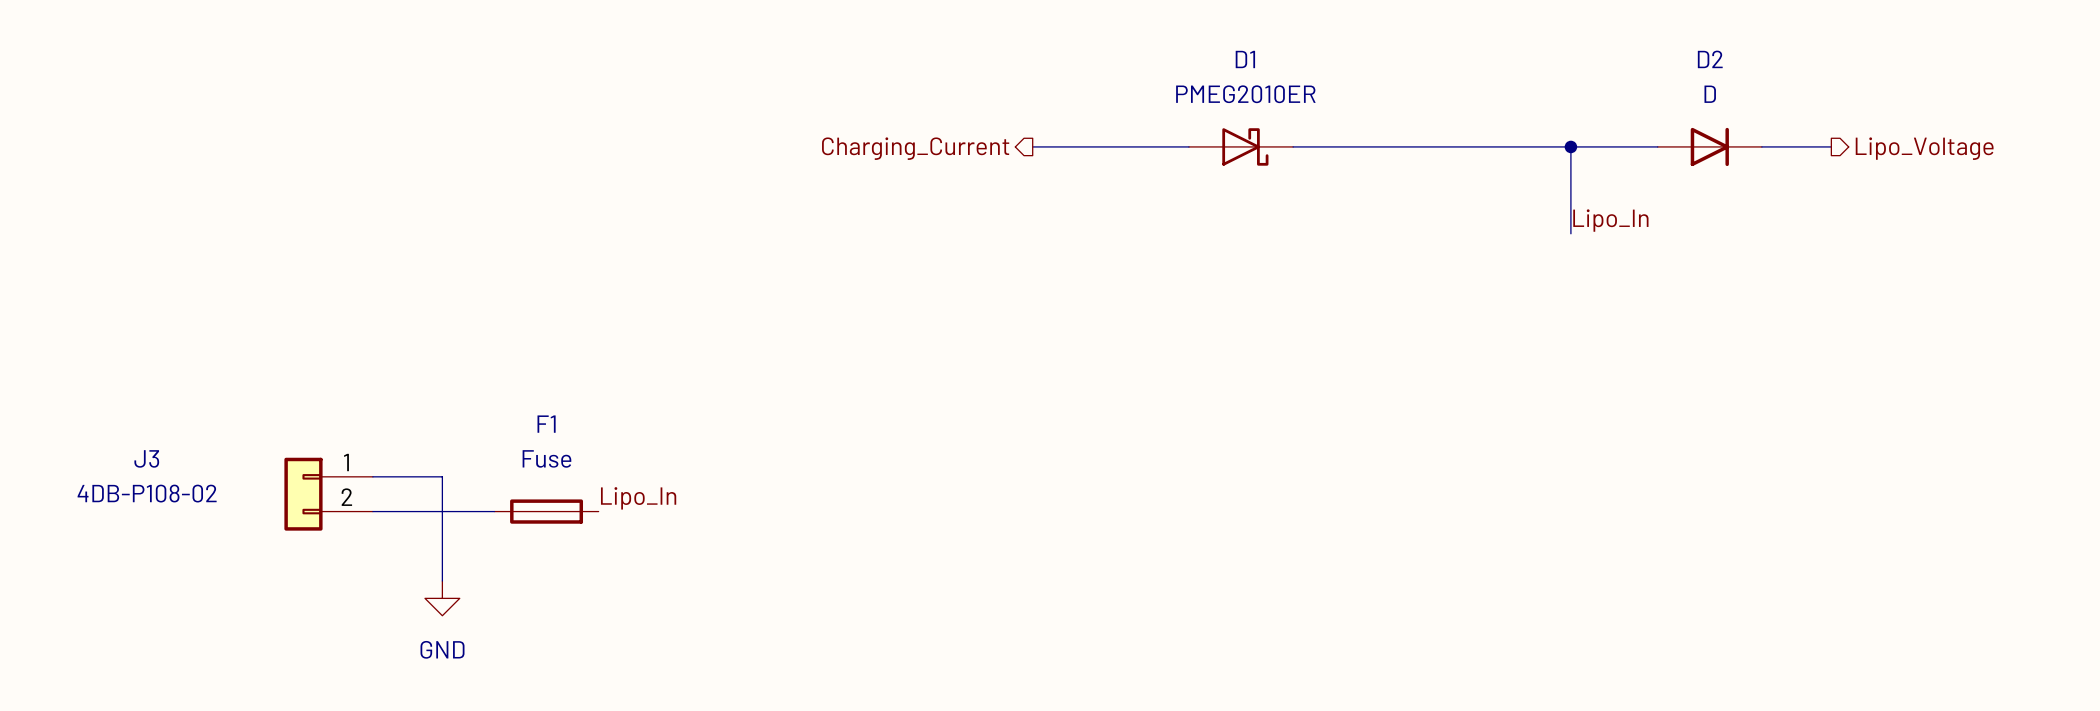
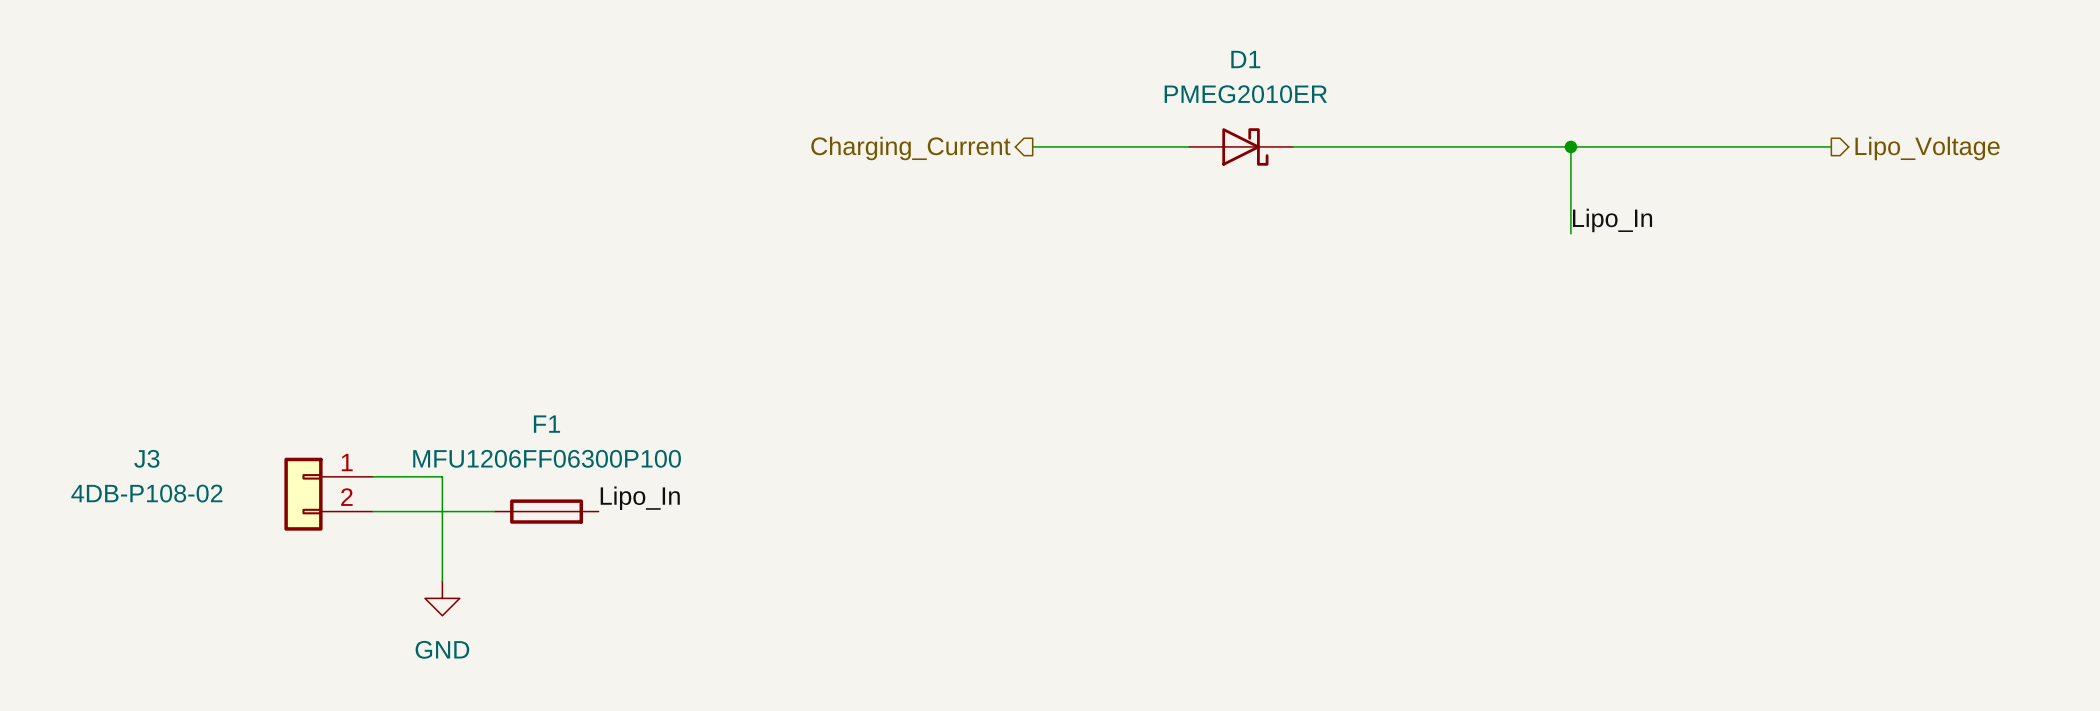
D2: D (1709, 146) -> none
F1 value: Fuse (546, 458) -> MFU1206FF06300P100 (547, 458)

